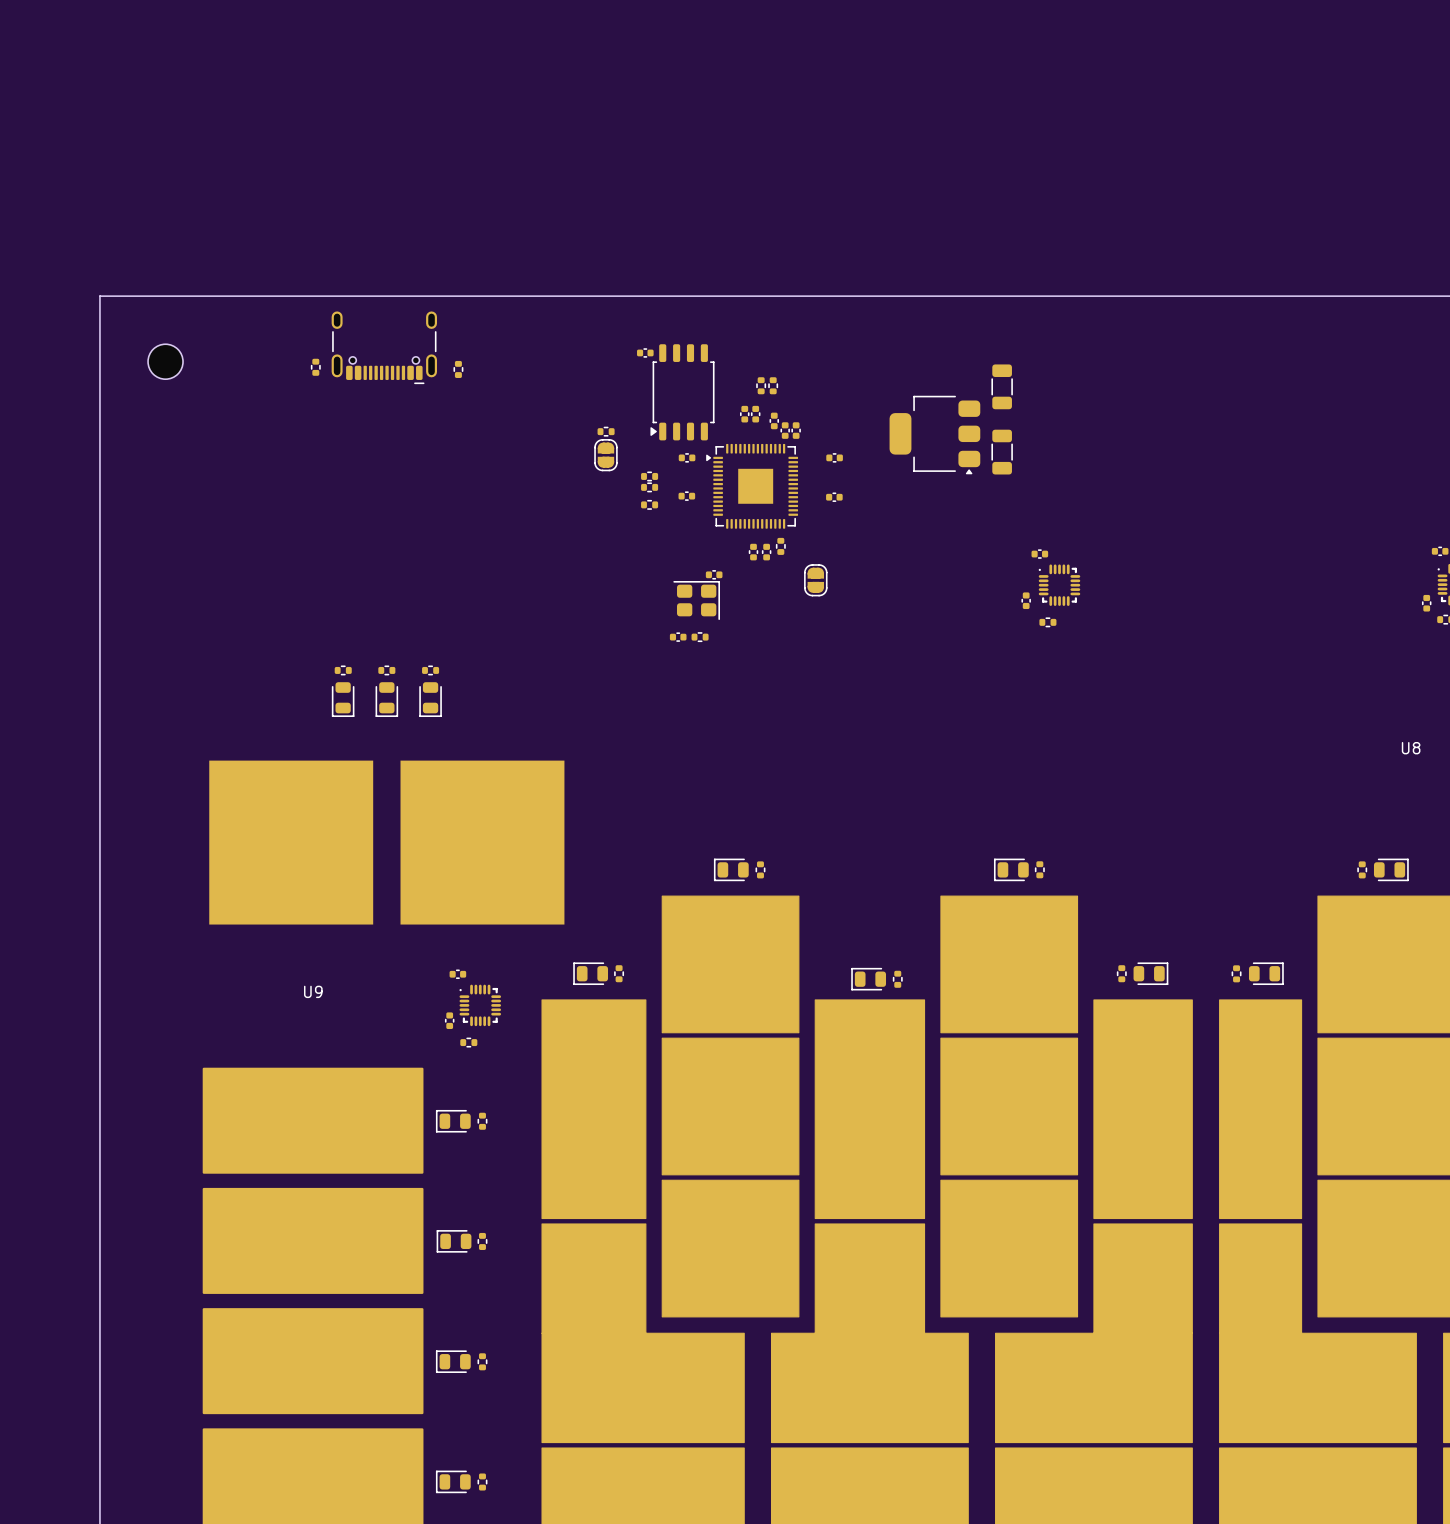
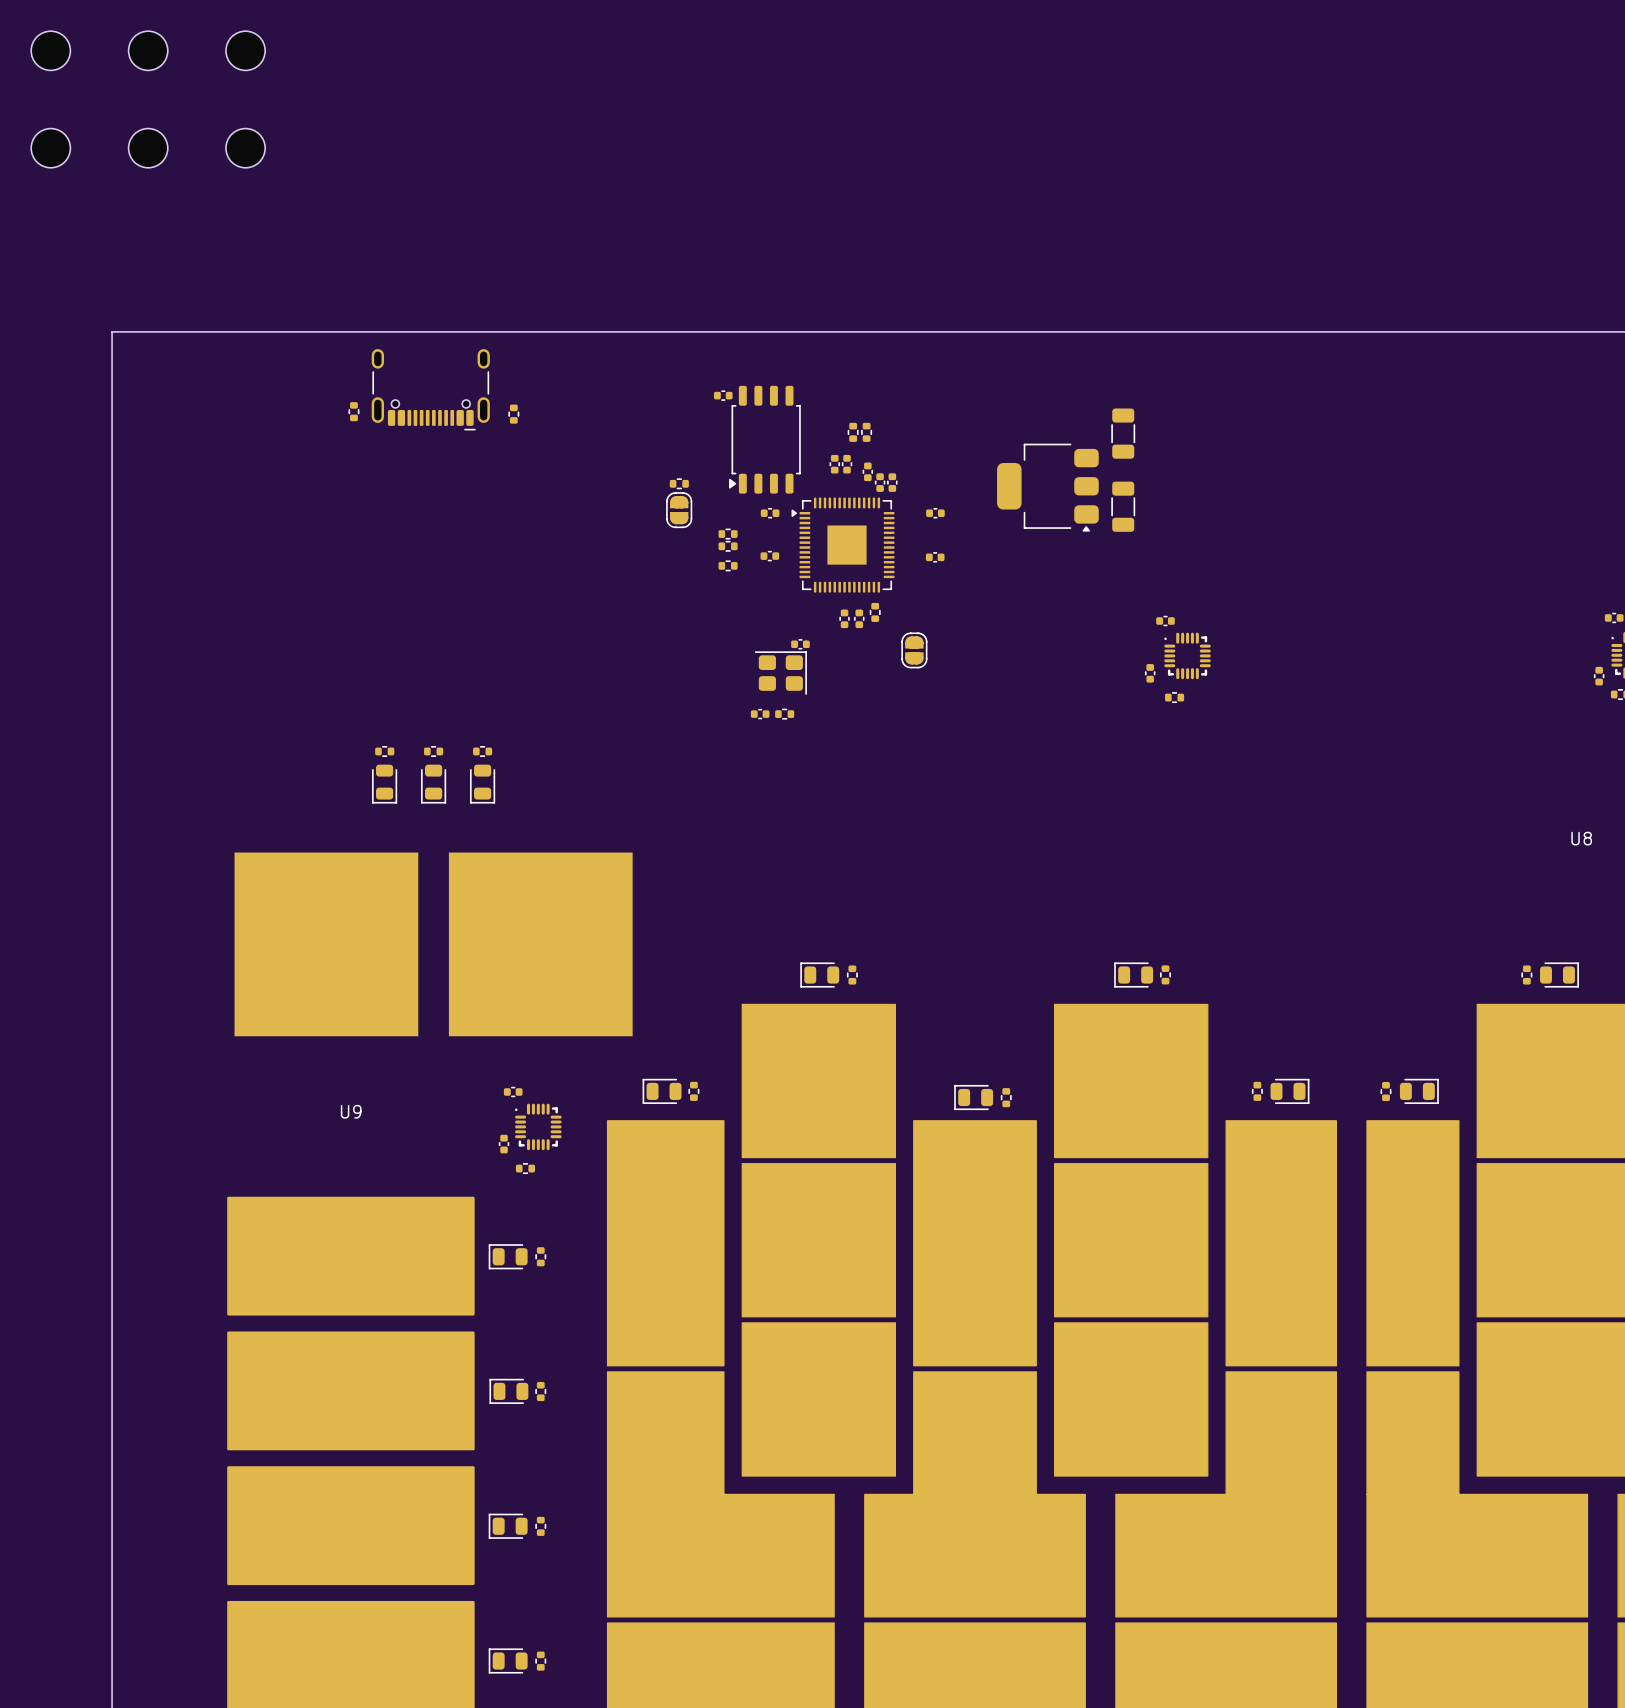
part: none -> (50, 50)
part: none -> (148, 50)
part: none -> (245, 50)
part: none -> (50, 148)
part: none -> (148, 148)
part: none -> (245, 148)
part: (165, 361) -> none

